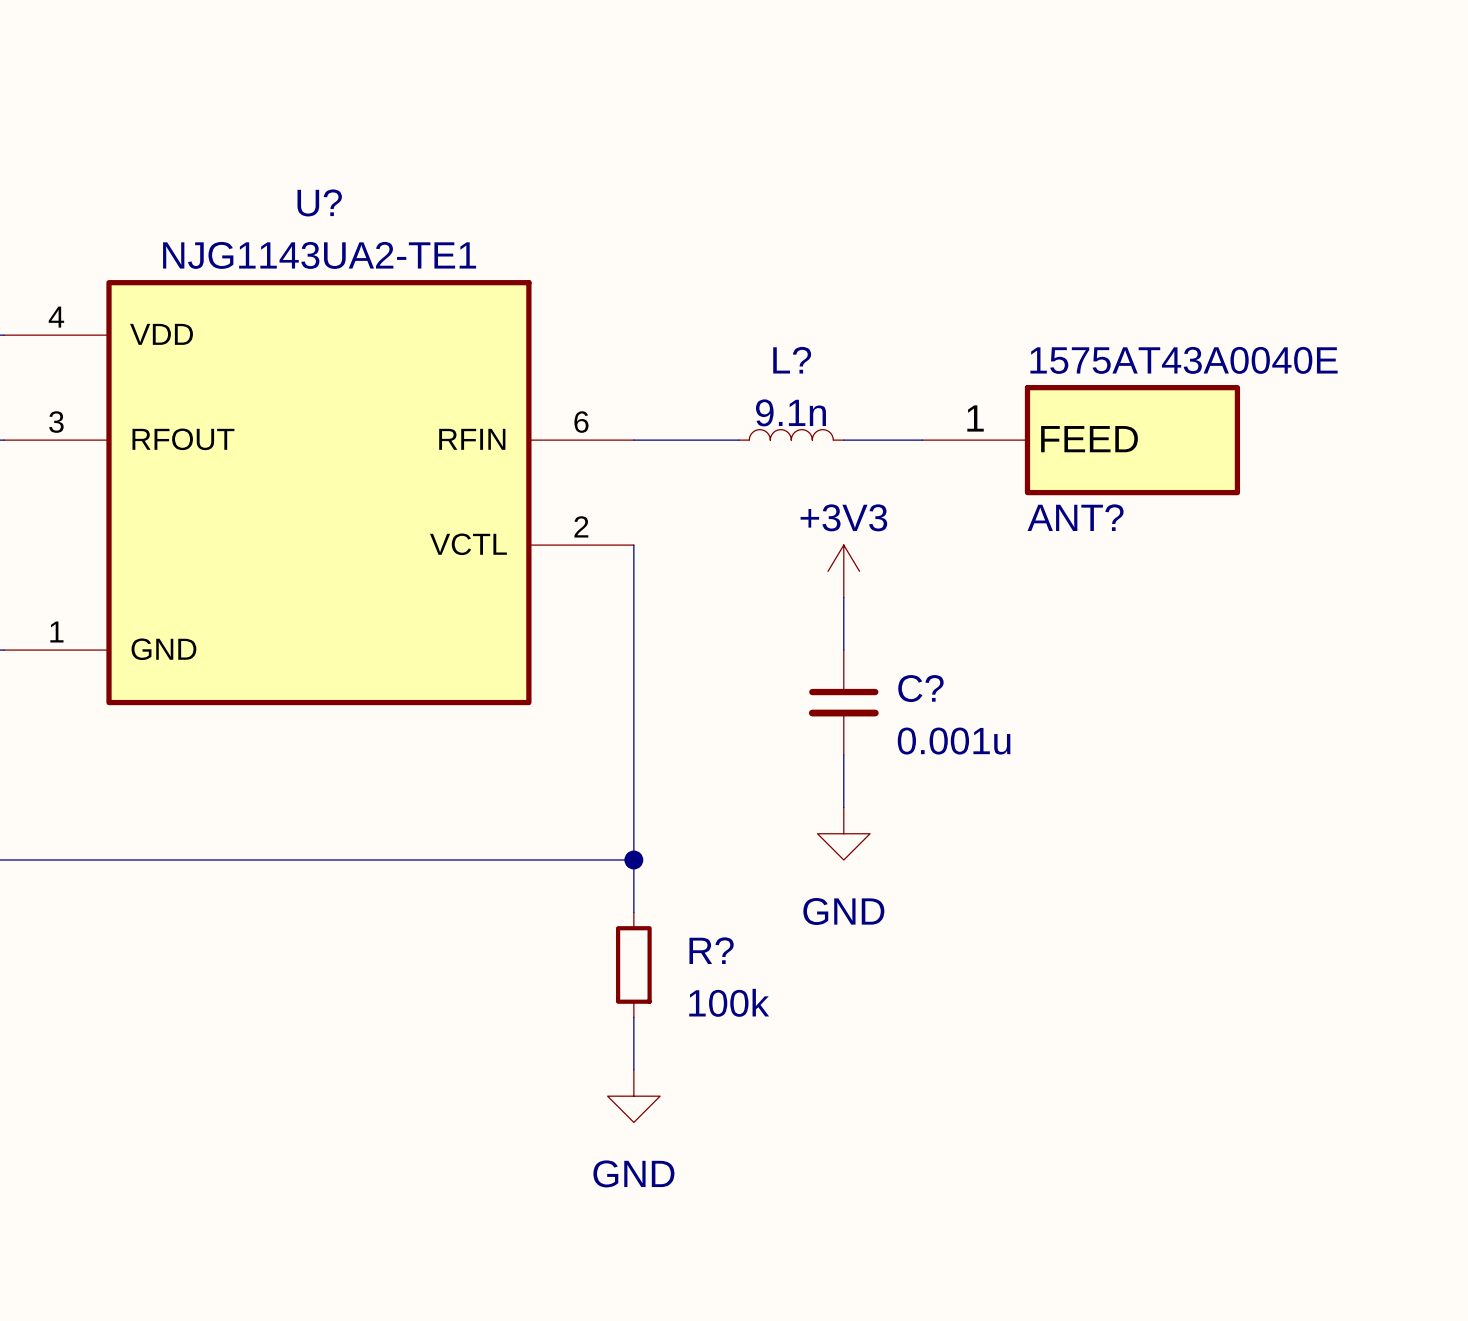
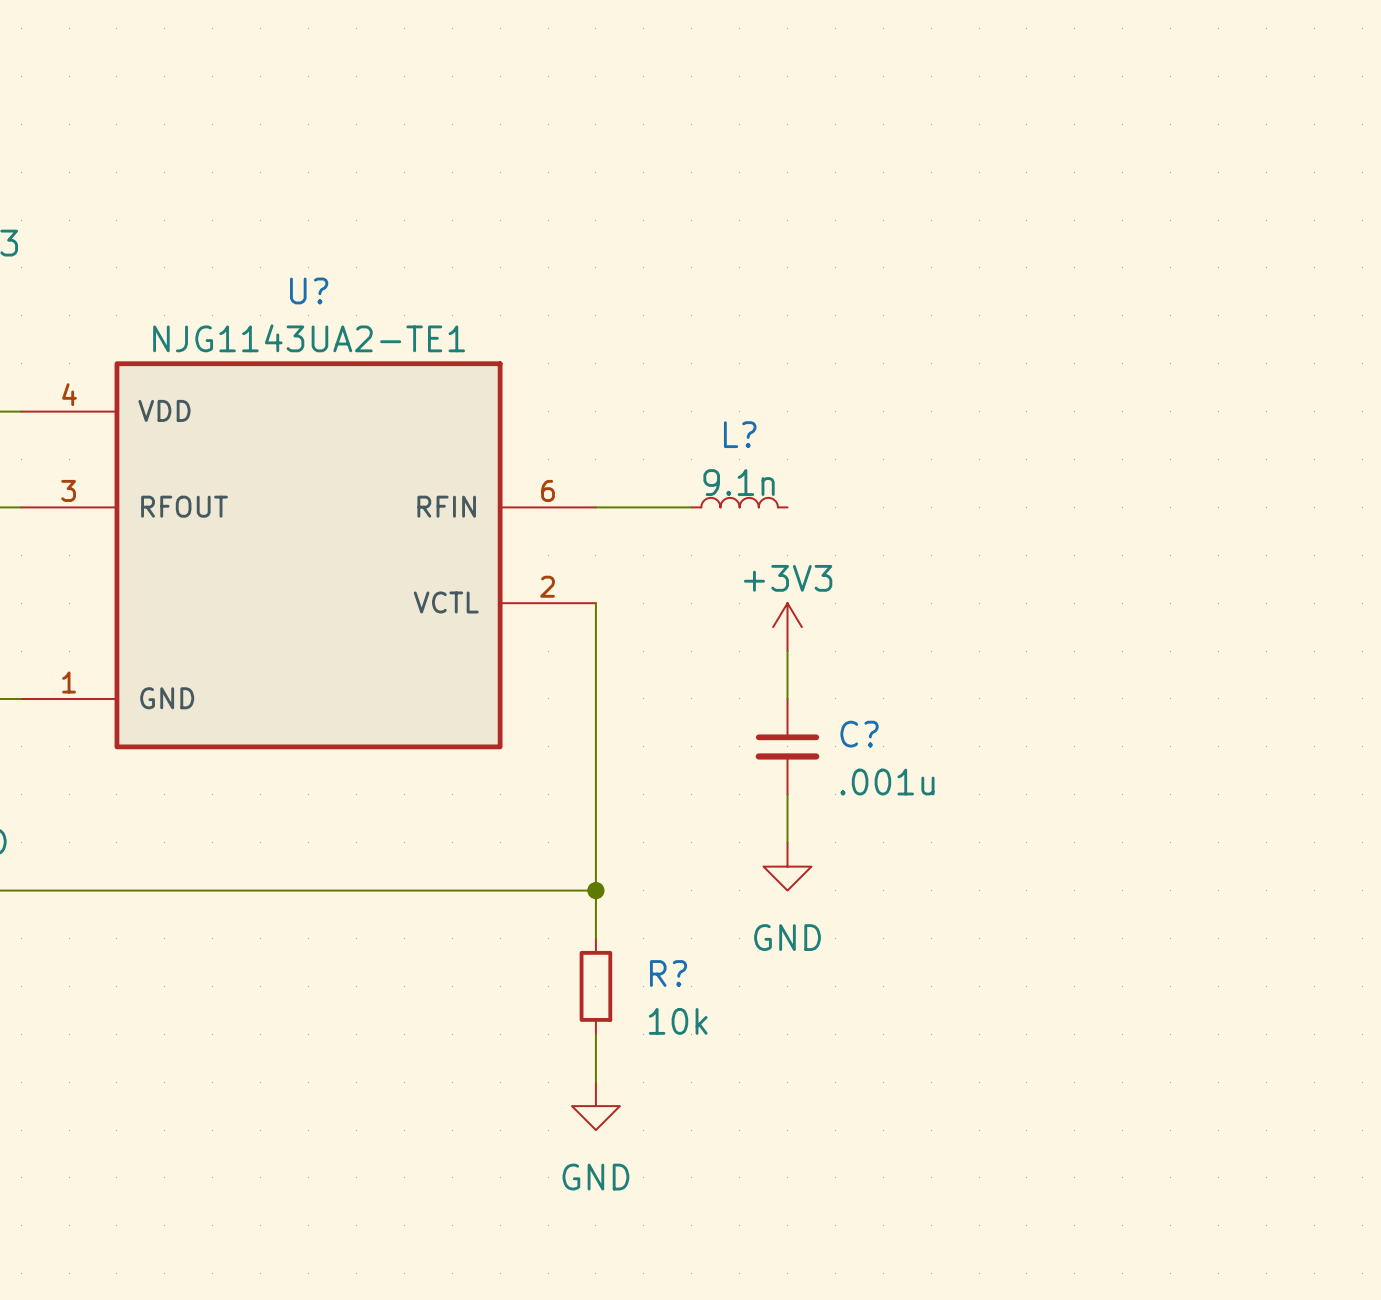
wire: (843, 440) (922, 440) -> none
ANT?: 1575AT43A0040E (1081, 440) -> none
C? value: 0.001u (954, 741) -> .001u (887, 782)
R? value: 100k (729, 1002) -> 10k (678, 1021)

